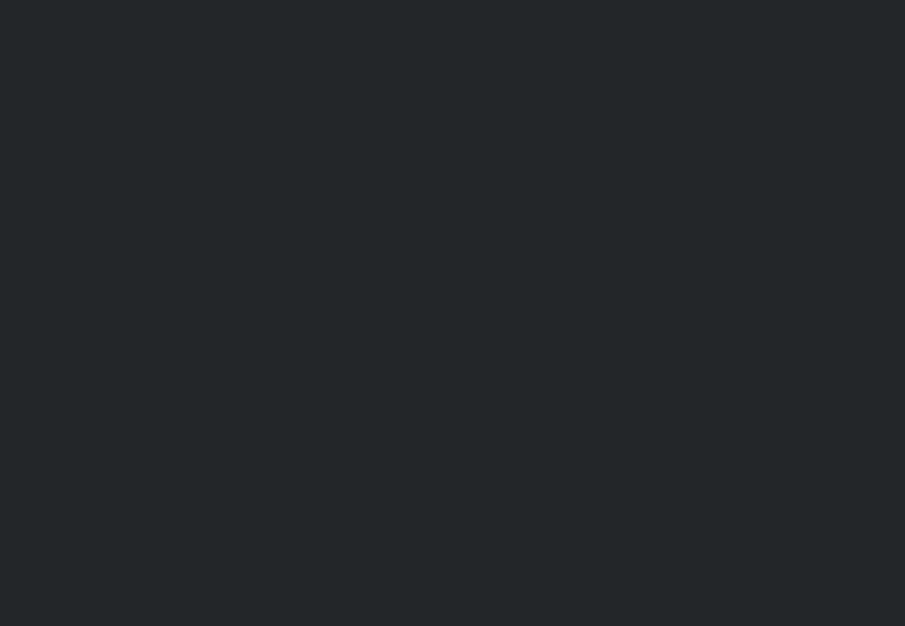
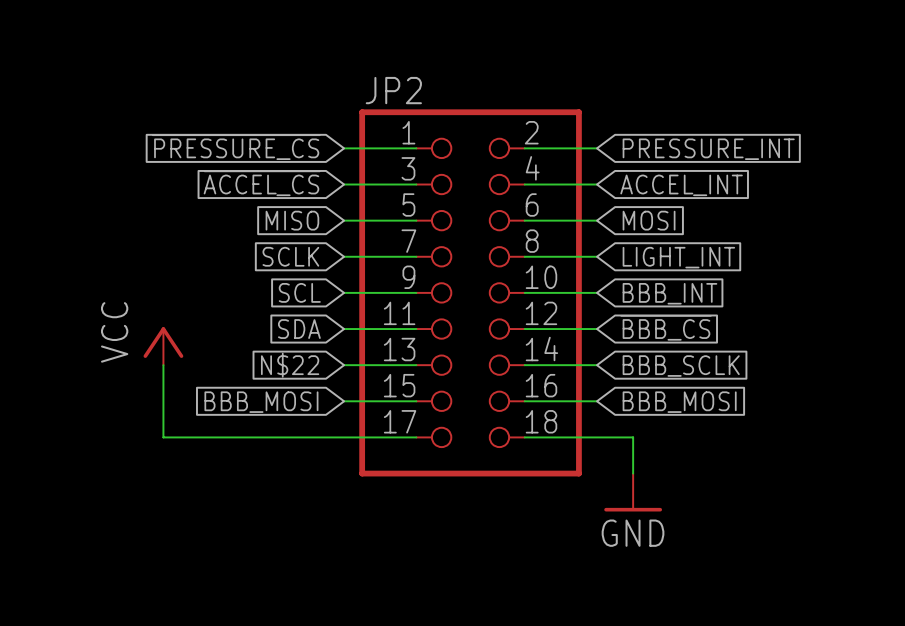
global label: none -> ~{PRESSURE_CS} (236, 147)
wire: none -> (344, 148) (416, 148)
wire: none -> (524, 148) (597, 148)
global label: none -> PRESSURE_INT (708, 149)
global label: none -> ~{ACCEL_CS} (262, 183)
wire: none -> (344, 184) (416, 184)
wire: none -> (524, 184) (597, 184)
global label: none -> ACCEL_INT (681, 185)
global label: none -> MISO (292, 220)
wire: none -> (344, 220) (416, 220)
wire: none -> (524, 220) (597, 220)
global label: none -> MOSI (649, 220)
global label: none -> SCLK (290, 256)
wire: none -> (344, 256) (416, 256)
wire: none -> (524, 256) (597, 256)
global label: none -> LIGHT_INT (678, 257)
global label: none -> SCL (299, 292)
wire: none -> (344, 292) (416, 292)
JP2: none -> (470, 292)
wire: none -> (524, 292) (597, 292)
global label: none -> BBB_INT (669, 293)
global label: none -> ~{BBB_CS} (666, 327)
global label: none -> SDA (299, 329)
wire: none -> (344, 329) (416, 329)
wire: none -> (524, 329) (597, 329)
power symbol: none -> VCC (163, 346)
wire: none -> (163, 365) (163, 437) (416, 437)
global label: none -> N$22 (290, 365)
wire: none -> (344, 365) (416, 365)
wire: none -> (524, 365) (597, 365)
global label: none -> BBB_SCLK (681, 366)
wire: none -> (344, 401) (416, 401)
wire: none -> (524, 401) (597, 401)
global label: none -> BBB_MOSI (261, 402)
global label: none -> BBB_MOSI (679, 402)
wire: none -> (524, 437) (633, 437) (633, 473)
power symbol: none -> GND (633, 492)

